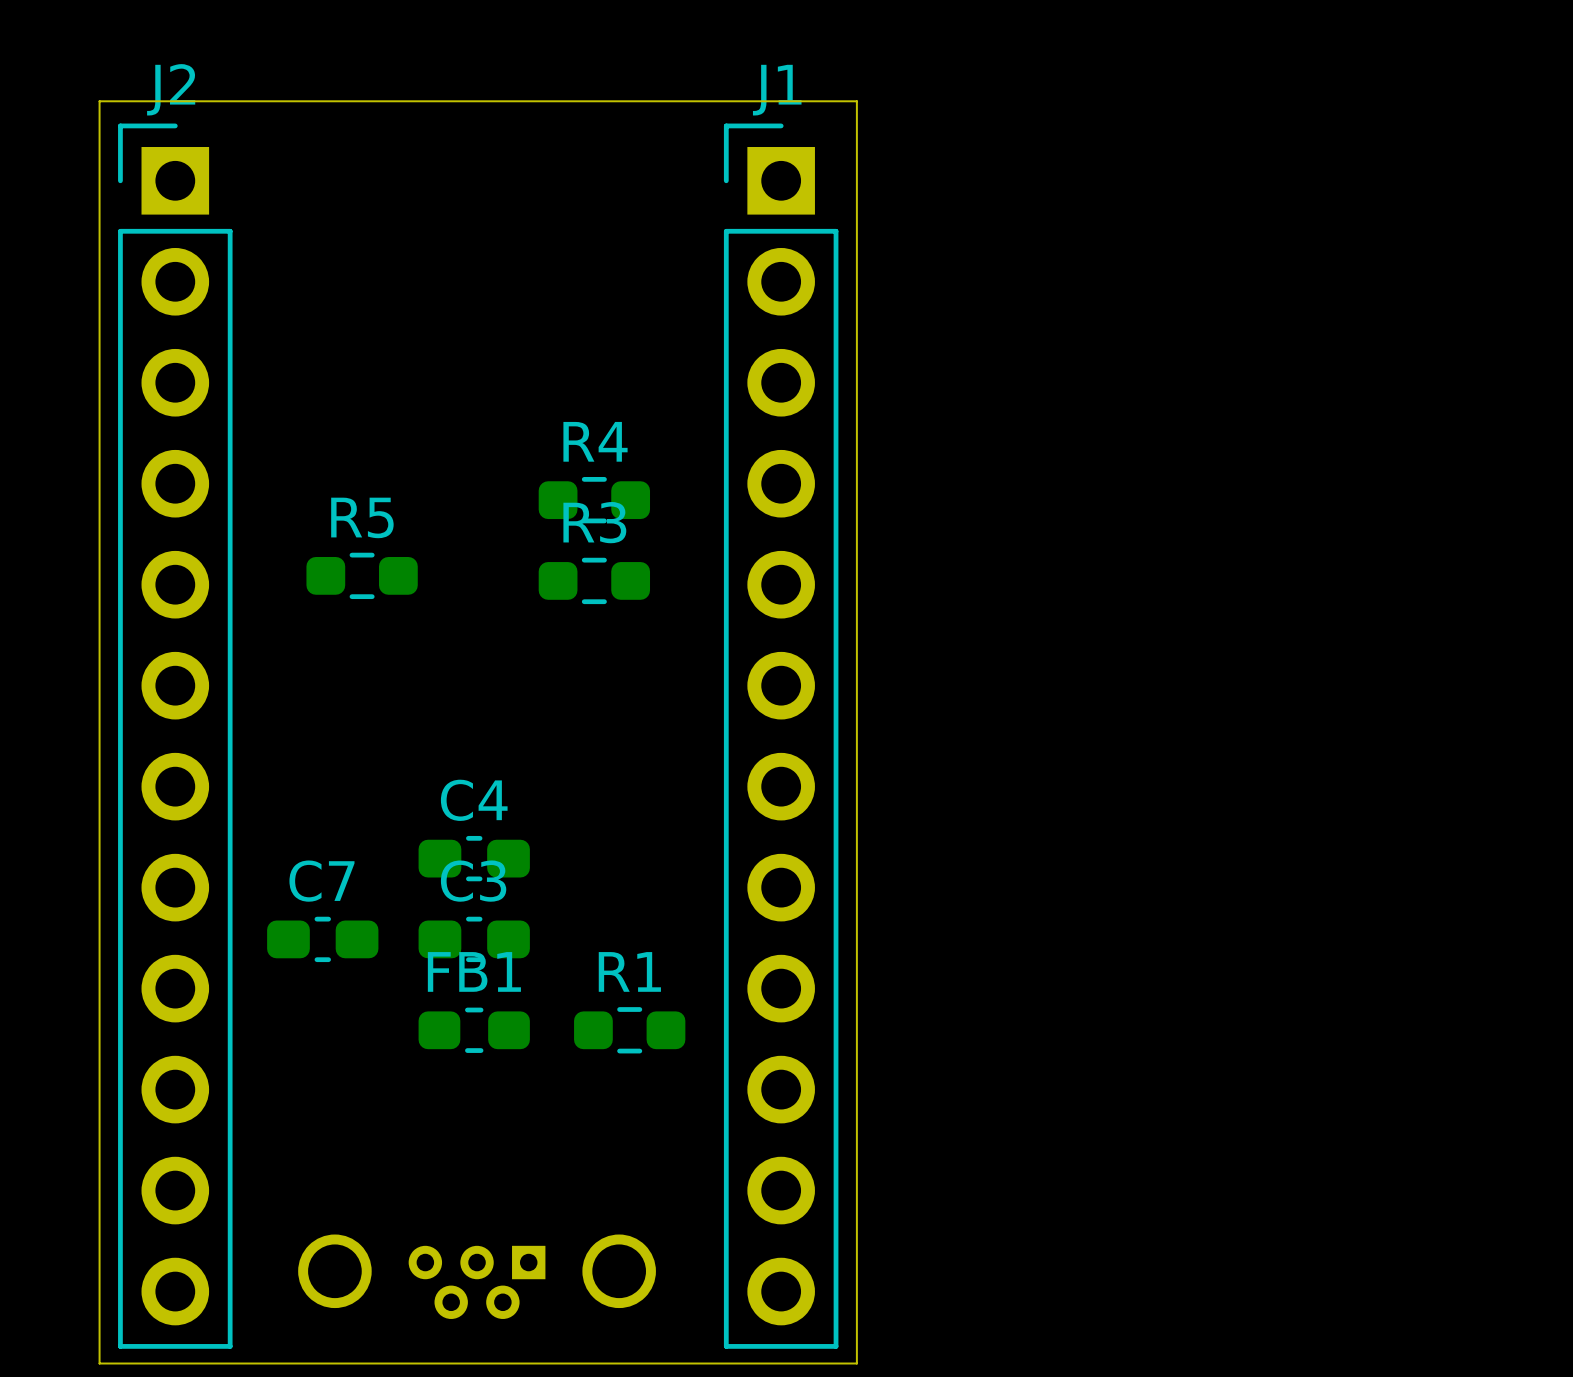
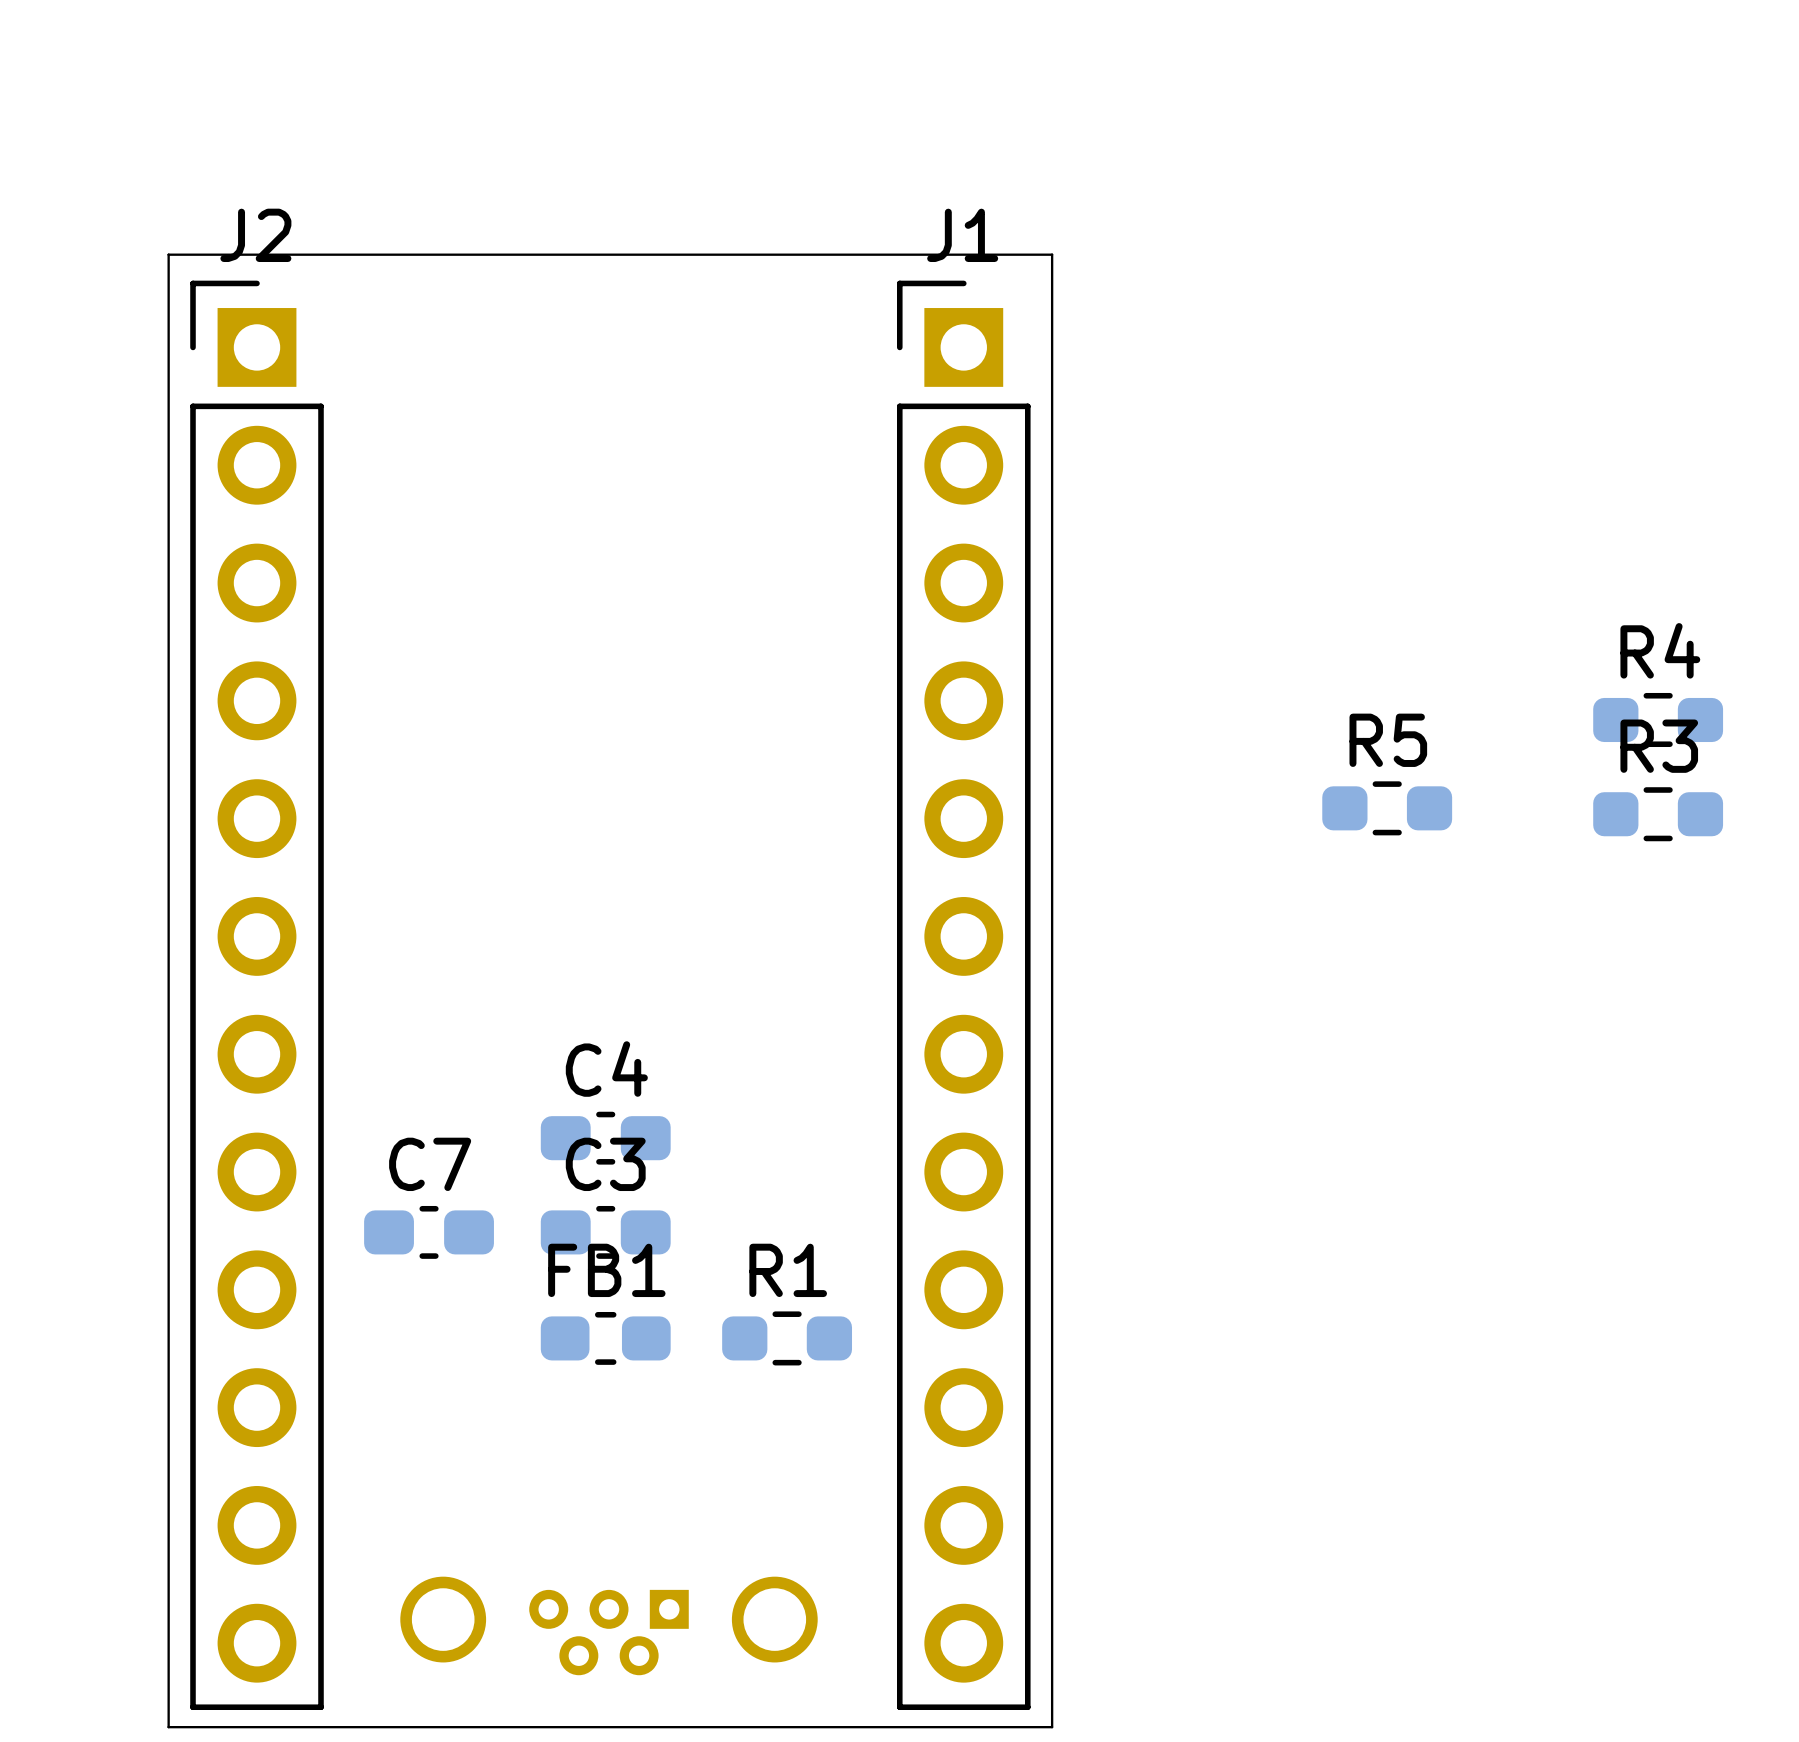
R4 position: (594, 500) -> (1658, 719)
R5 position: (362, 575) -> (1387, 808)
R3 position: (594, 580) -> (1658, 814)

